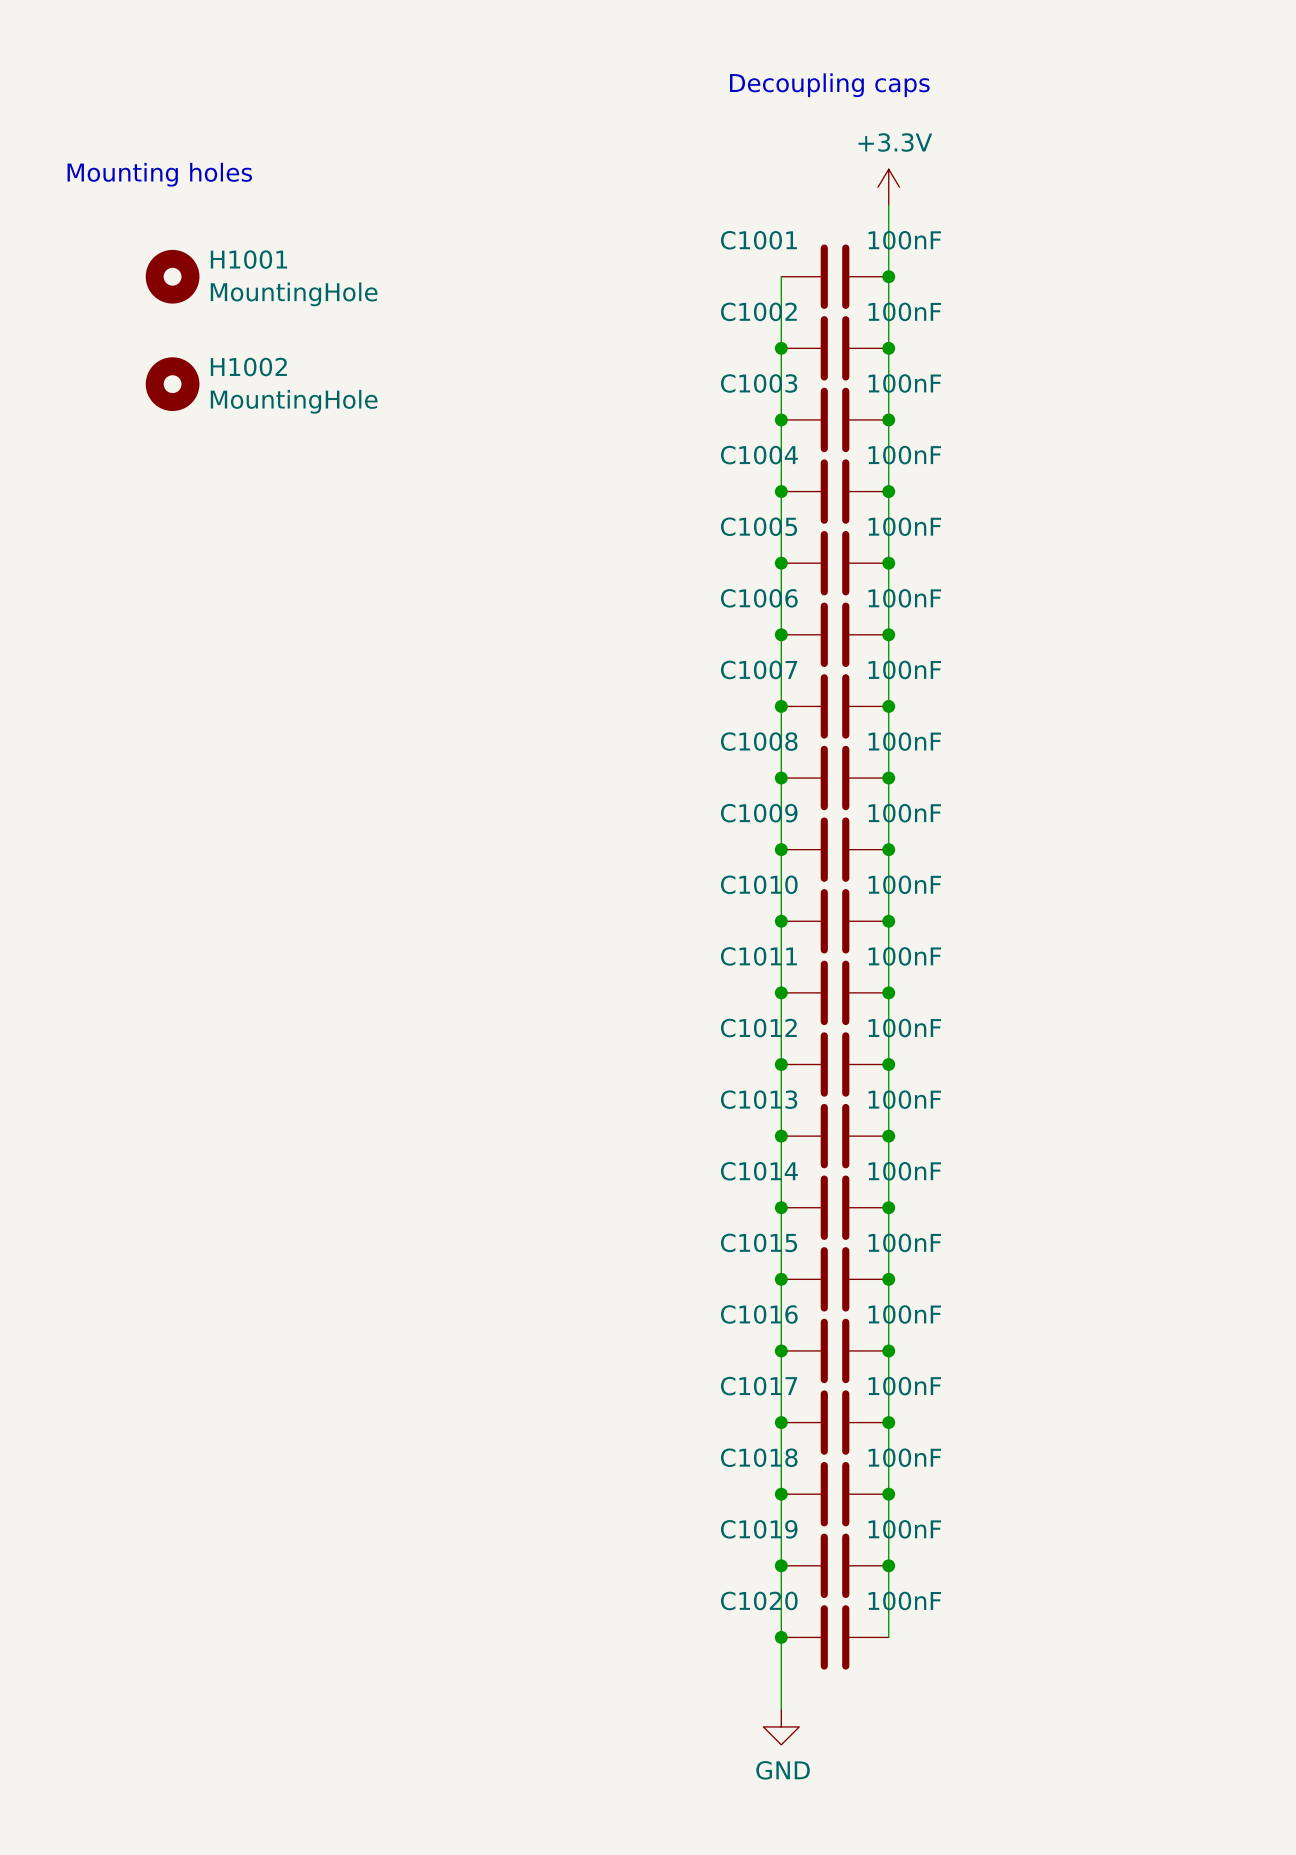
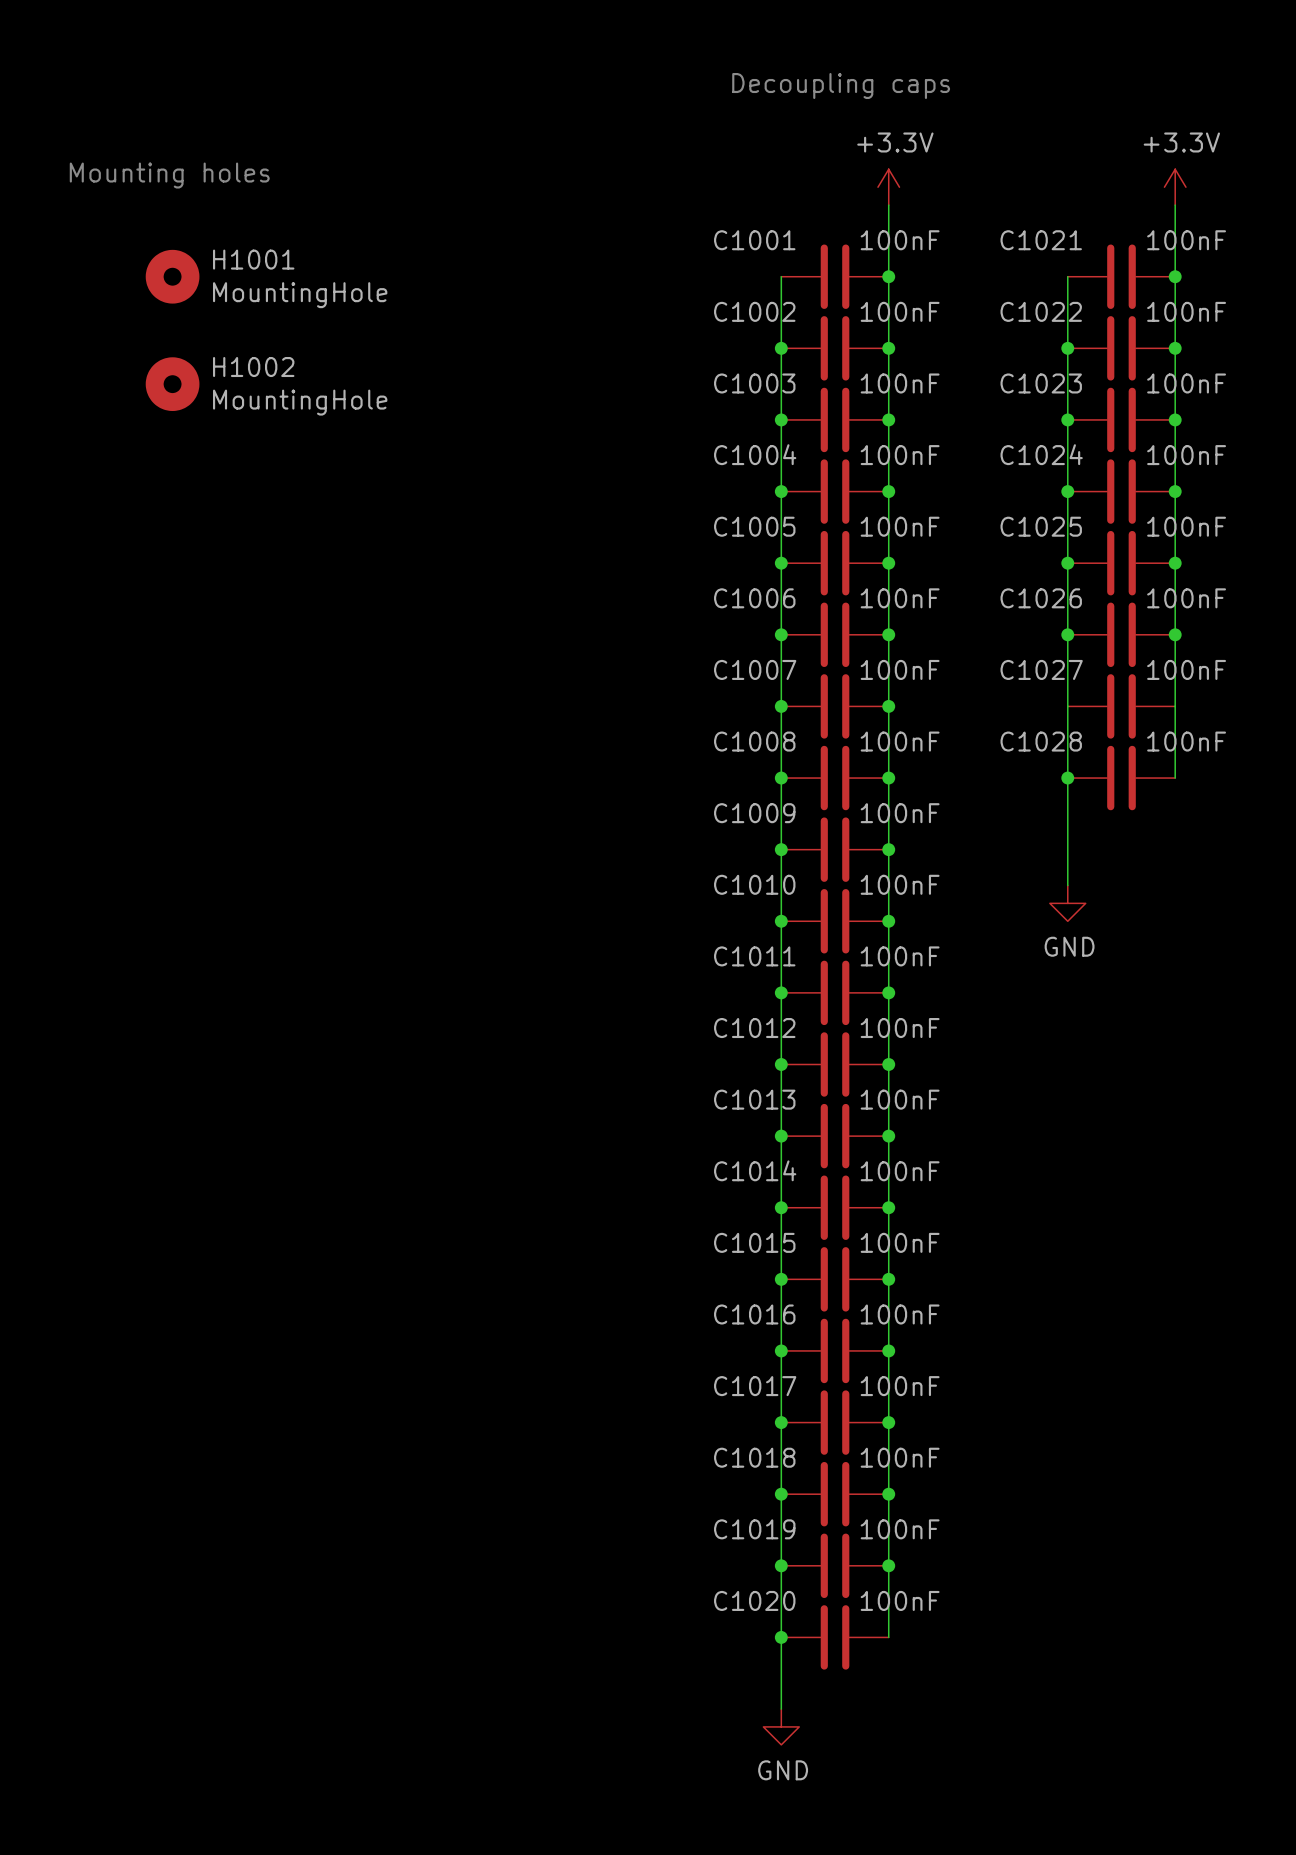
power symbol: none -> +3.3V (1175, 187)
wire: none -> (1175, 205) (1175, 778)
wire: none -> (1067, 276) (1067, 885)
C1021: none -> 100nF (1121, 276)
junction: none -> (1175, 276)
junction: none -> (1067, 348)
C1022: none -> 100nF (1121, 348)
junction: none -> (1175, 348)
junction: none -> (1067, 419)
C1023: none -> 100nF (1121, 419)
junction: none -> (1175, 419)
junction: none -> (1067, 491)
C1024: none -> 100nF (1121, 491)
junction: none -> (1175, 491)
junction: none -> (1067, 563)
C1025: none -> 100nF (1121, 563)
junction: none -> (1175, 563)
junction: none -> (1067, 634)
C1026: none -> 100nF (1121, 634)
junction: none -> (1175, 634)
C1027: none -> 100nF (1121, 706)
junction: none -> (1067, 778)
C1028: none -> 100nF (1121, 778)
power symbol: none -> GND (1067, 903)

